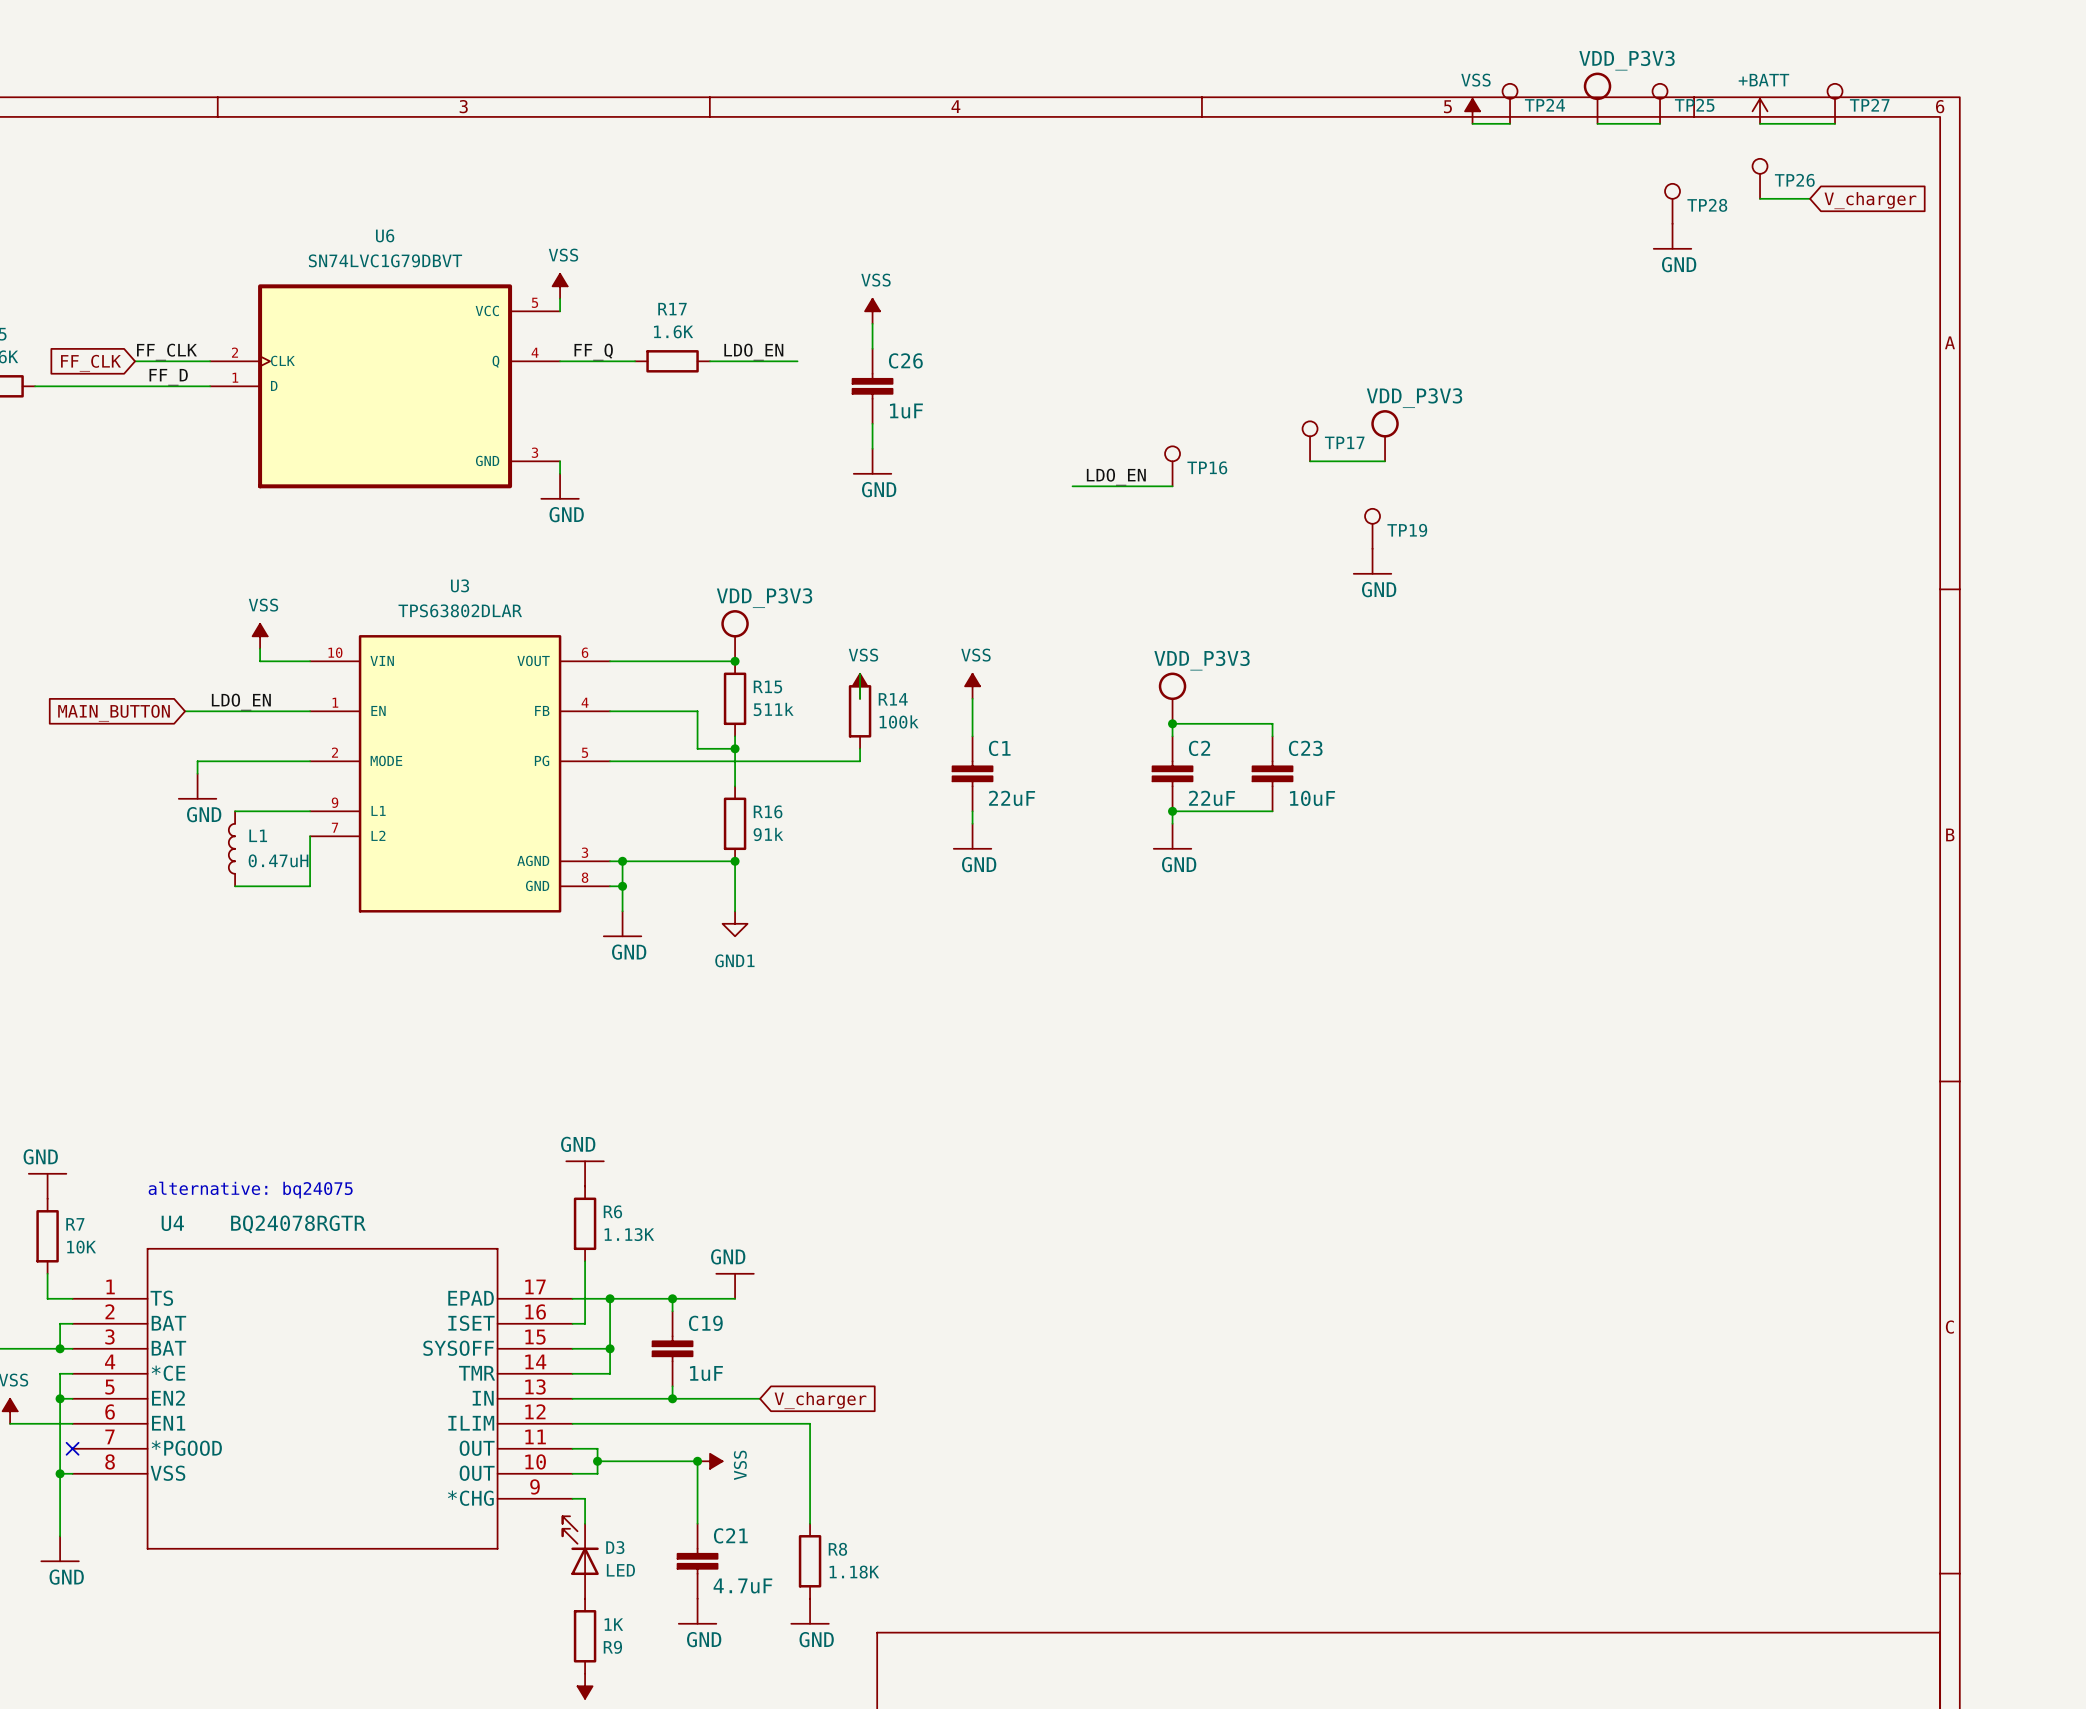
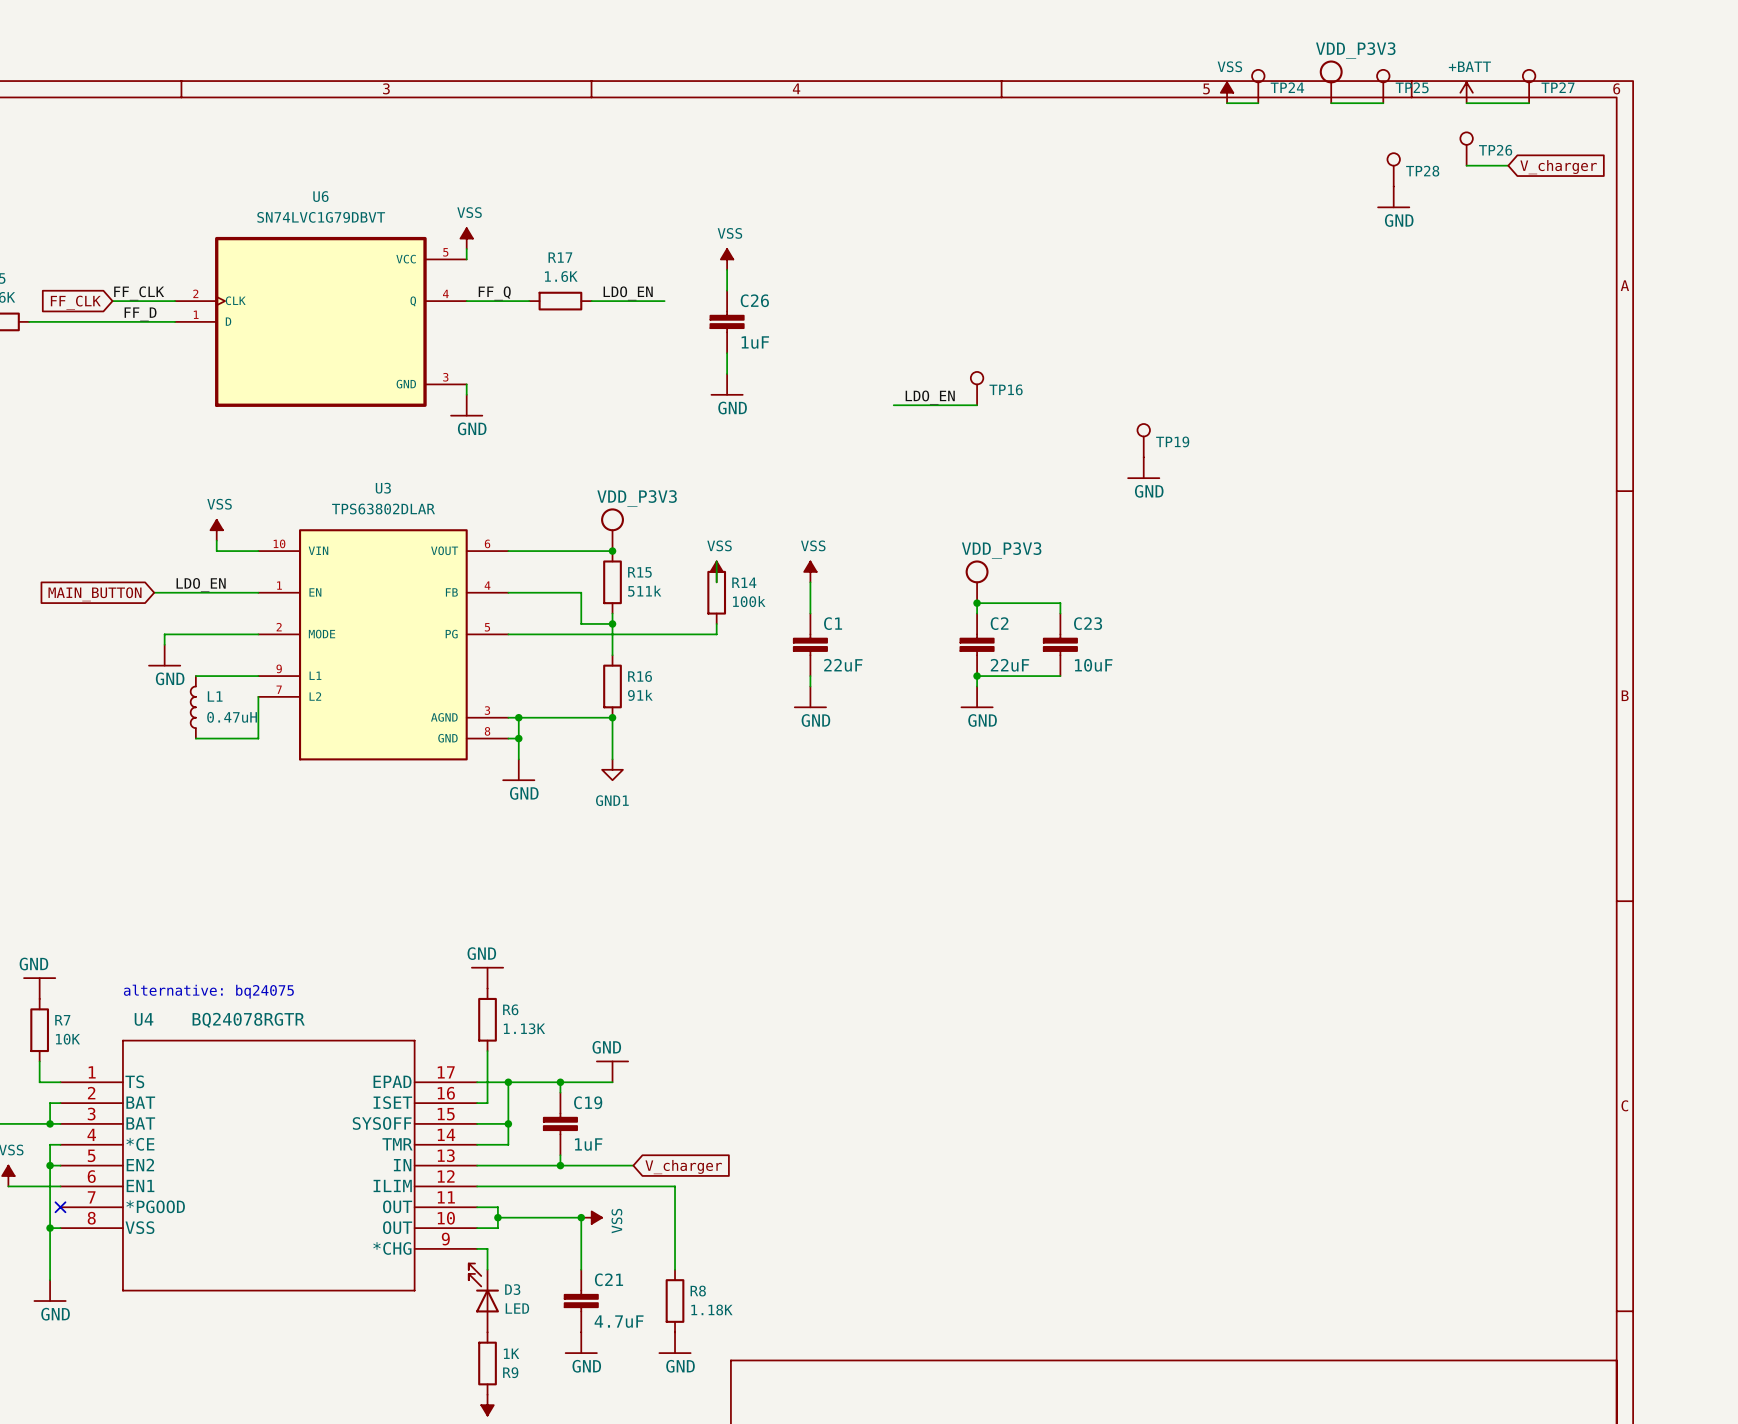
power symbol: VDD_P3V3 (1385, 435) -> none
TP17: (1310, 441) -> none
wire: (1310, 461) (1385, 461) -> none

